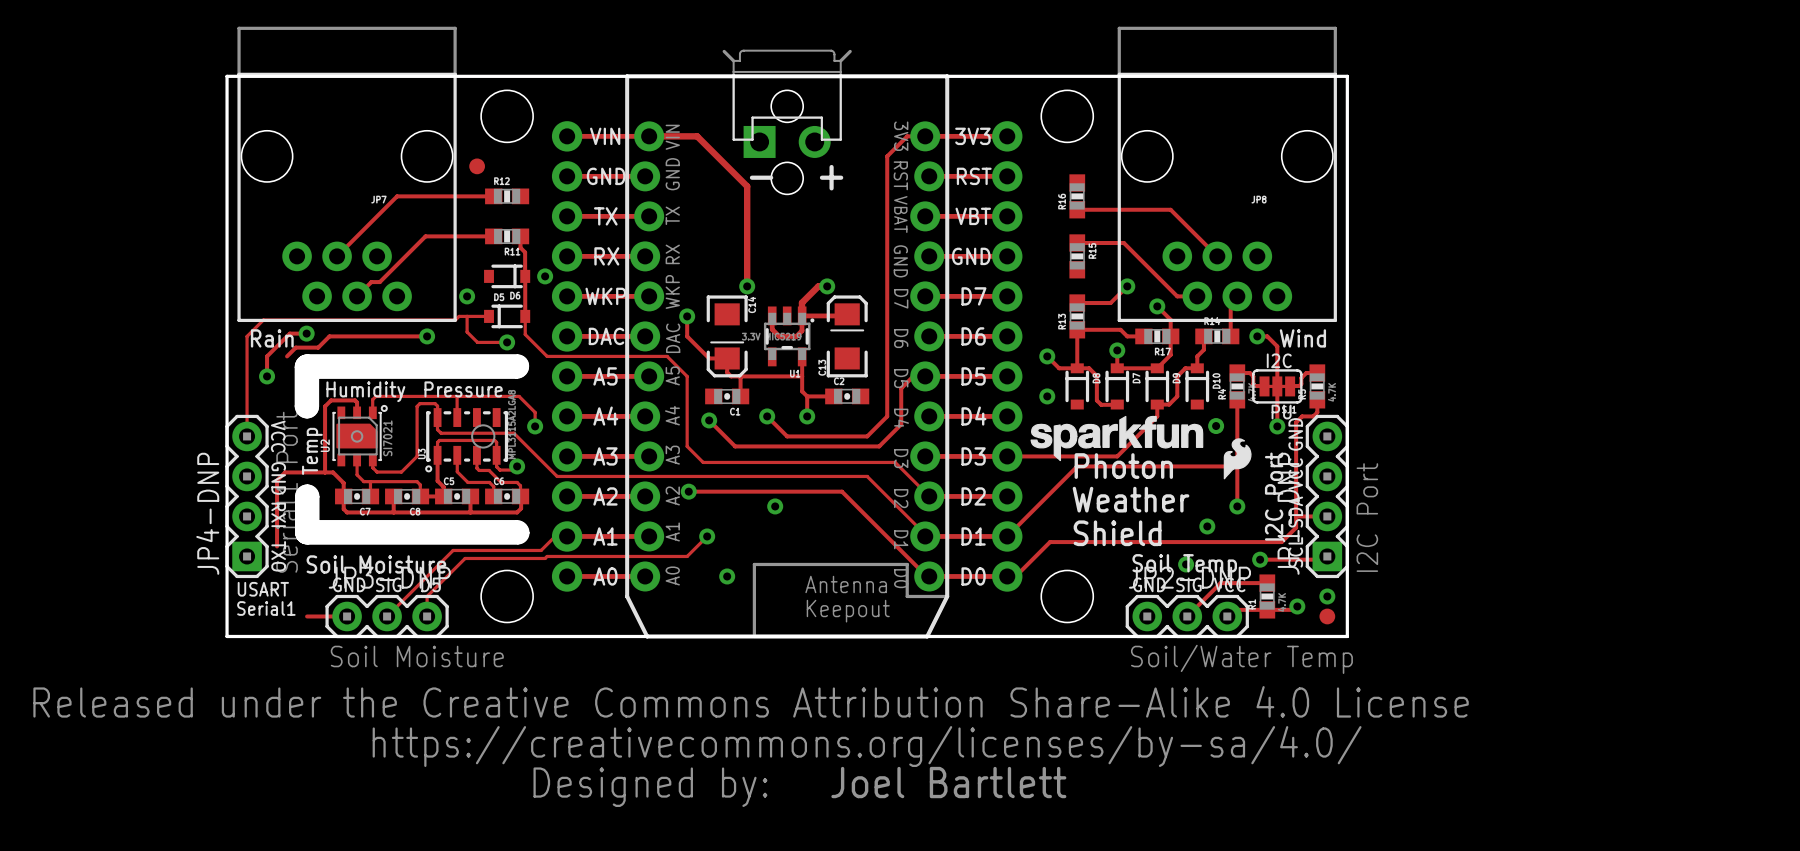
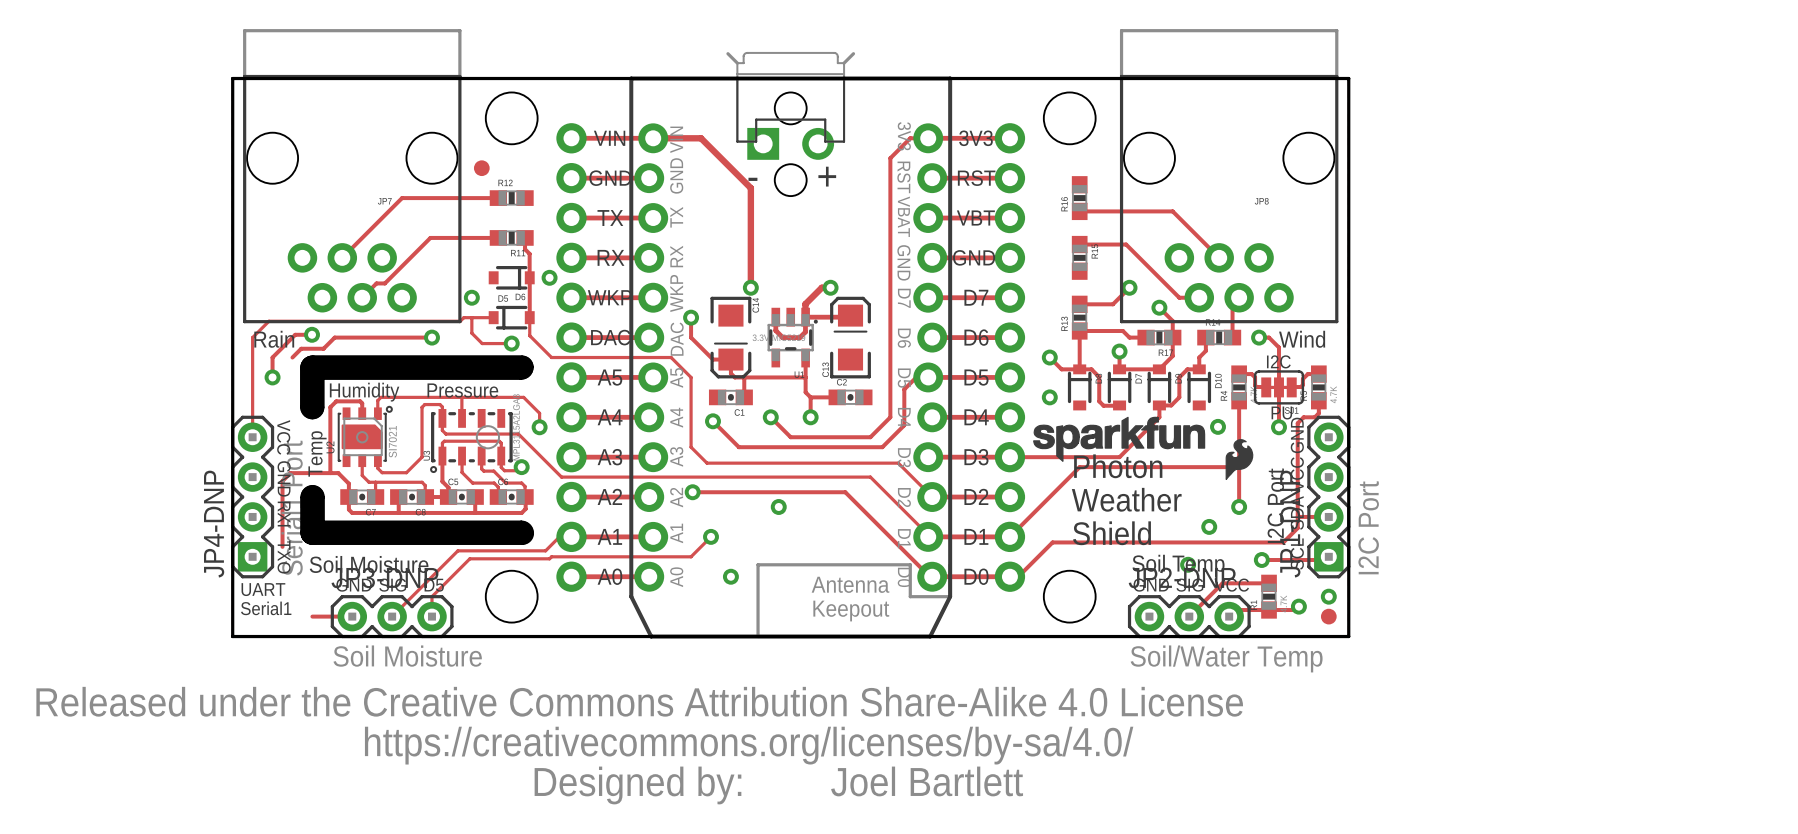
text: USART (263, 589) -> UART (263, 589)

